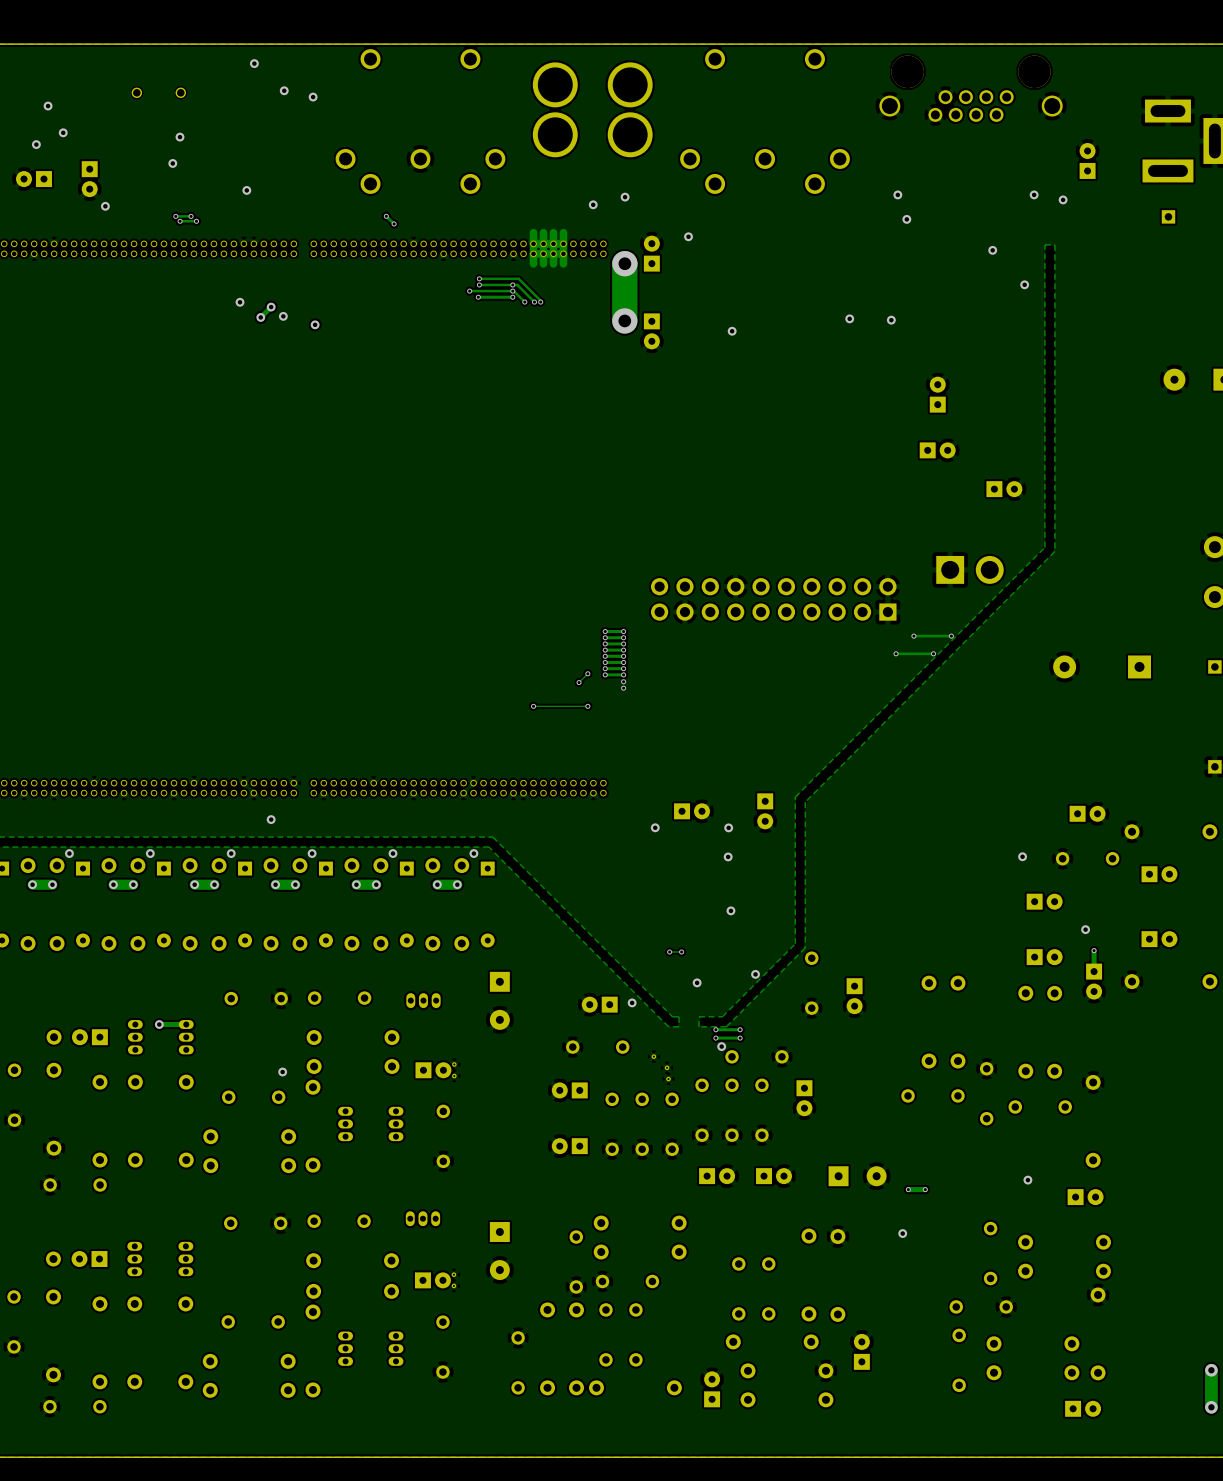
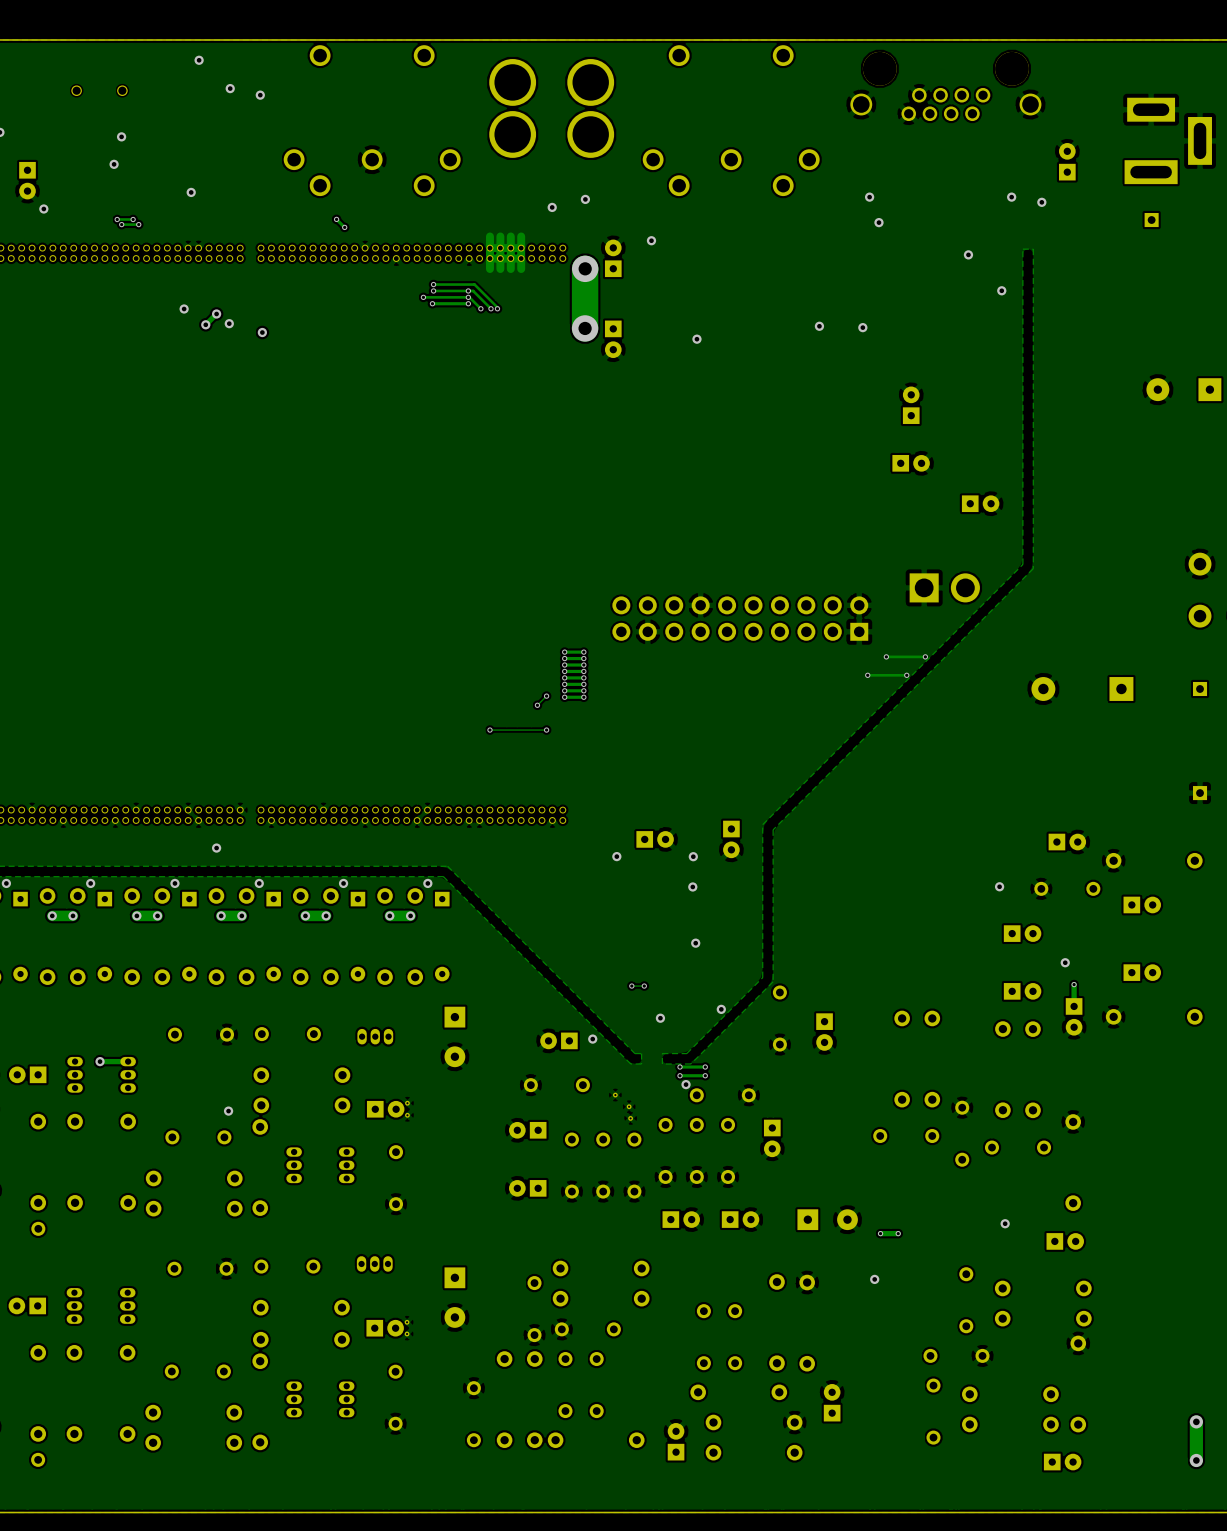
via: (623, 681) -> none
via: (623, 688) -> none

